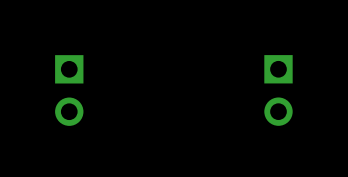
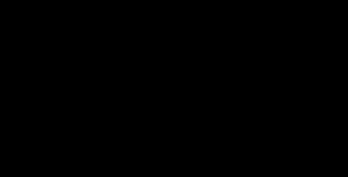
part: (69, 90) -> none
part: (278, 90) -> none

